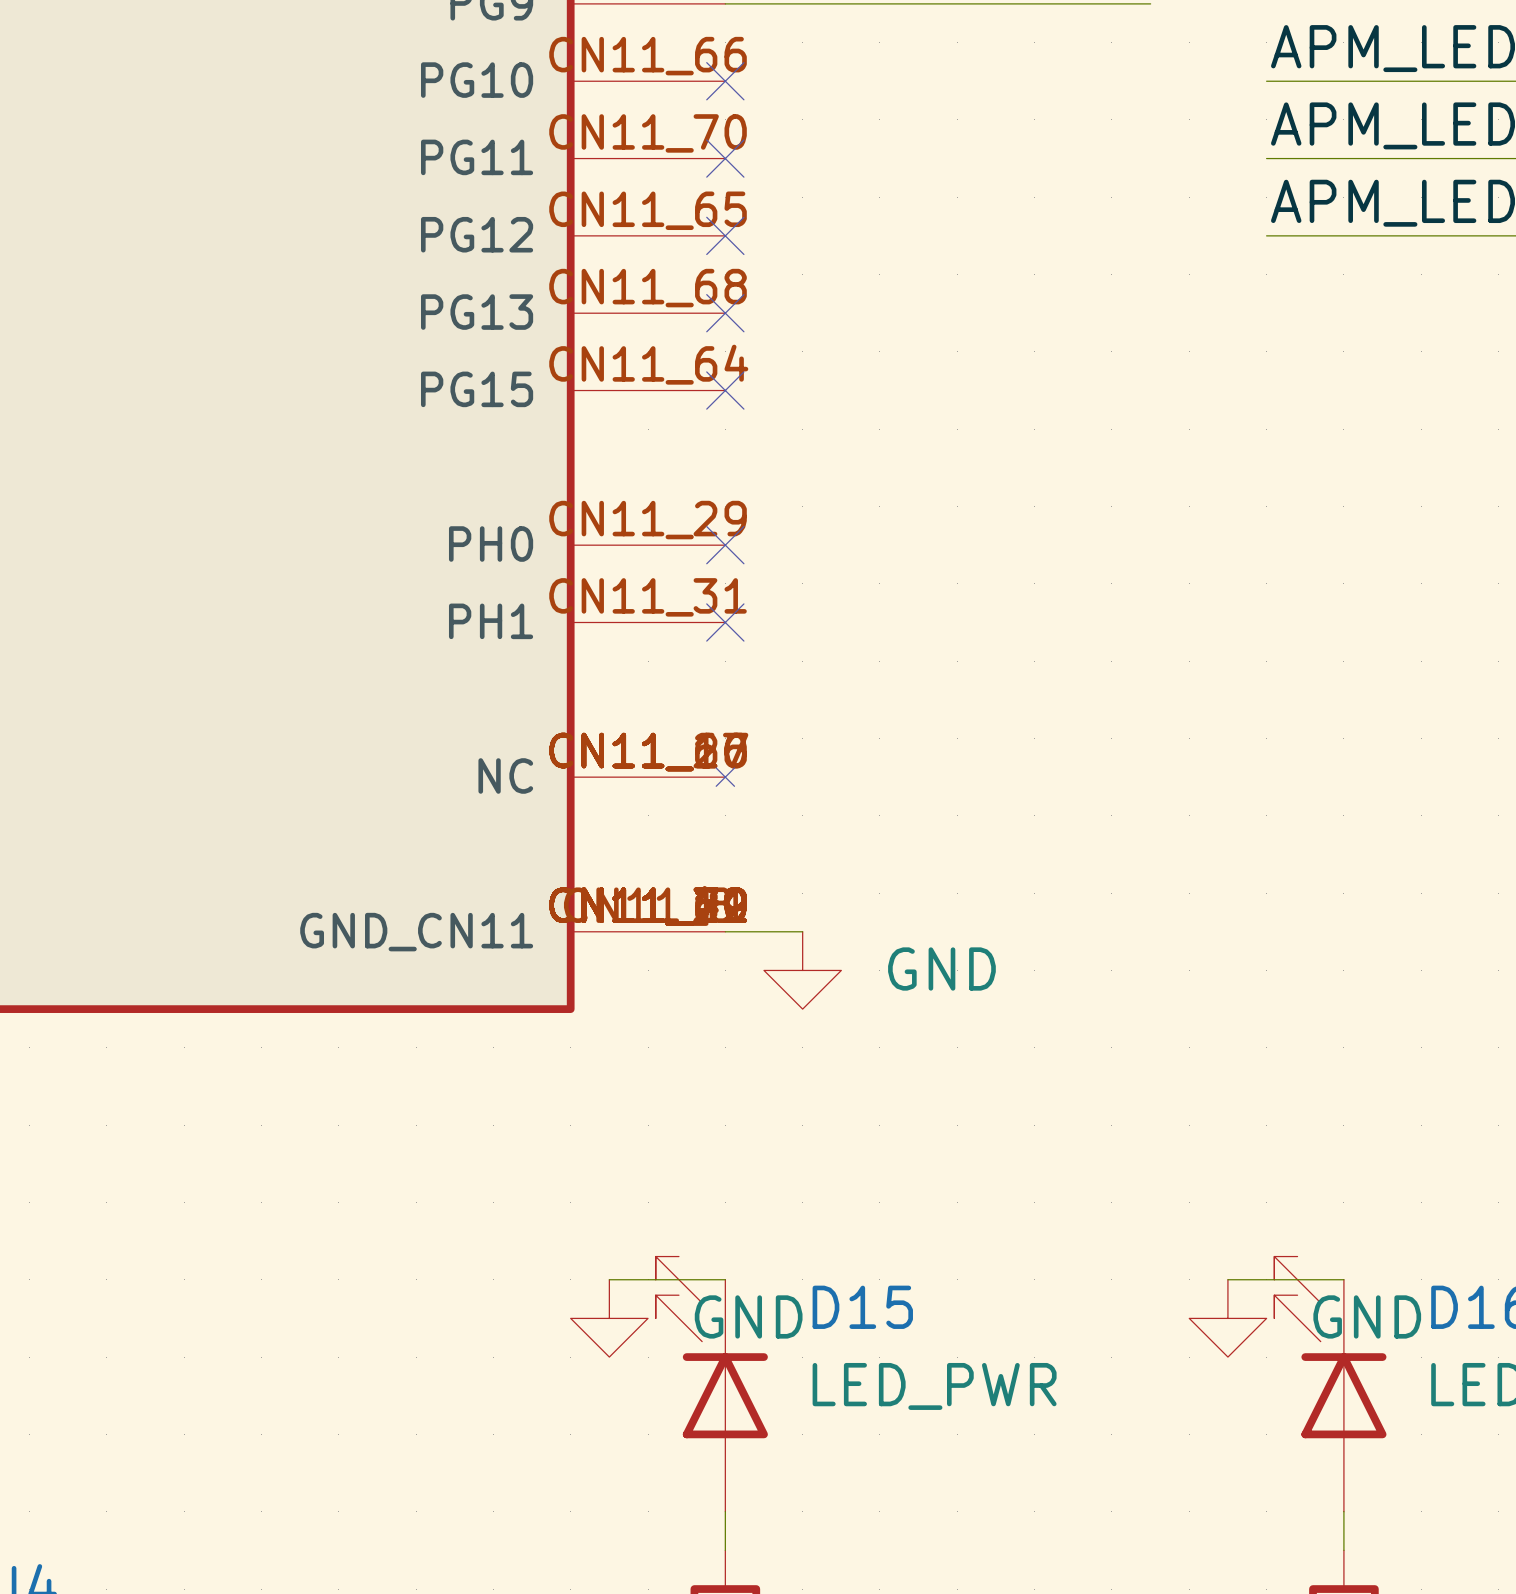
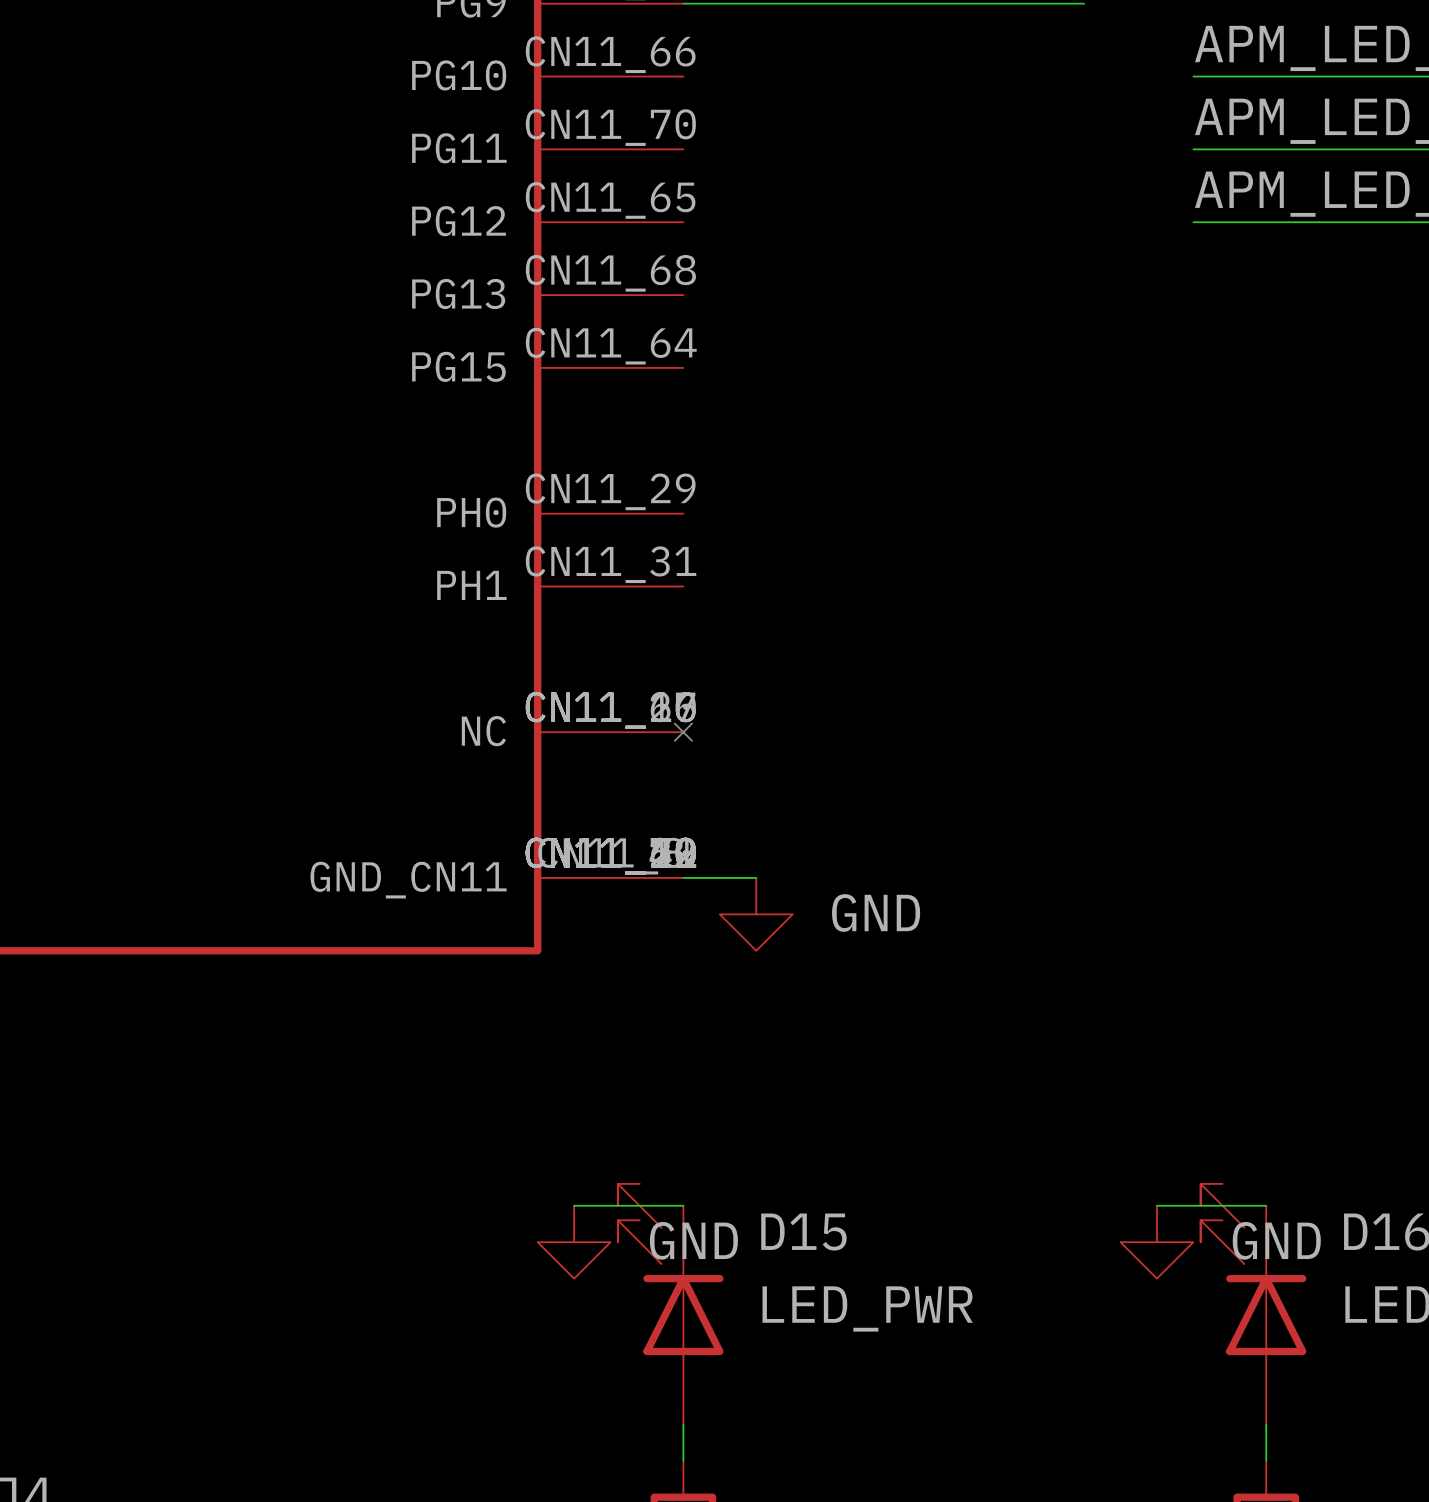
no-connect mark: (725, 81) -> none
no-connect mark: (725, 158) -> none
no-connect mark: (725, 235) -> none
no-connect mark: (725, 313) -> none
no-connect mark: (725, 390) -> none
no-connect mark: (725, 545) -> none
no-connect mark: (725, 622) -> none

